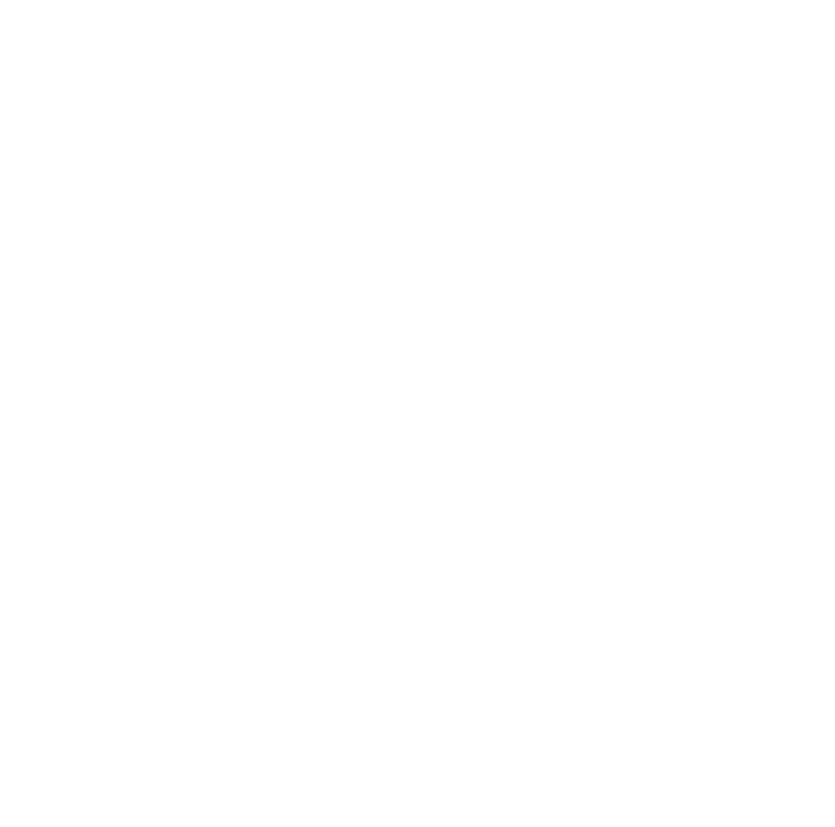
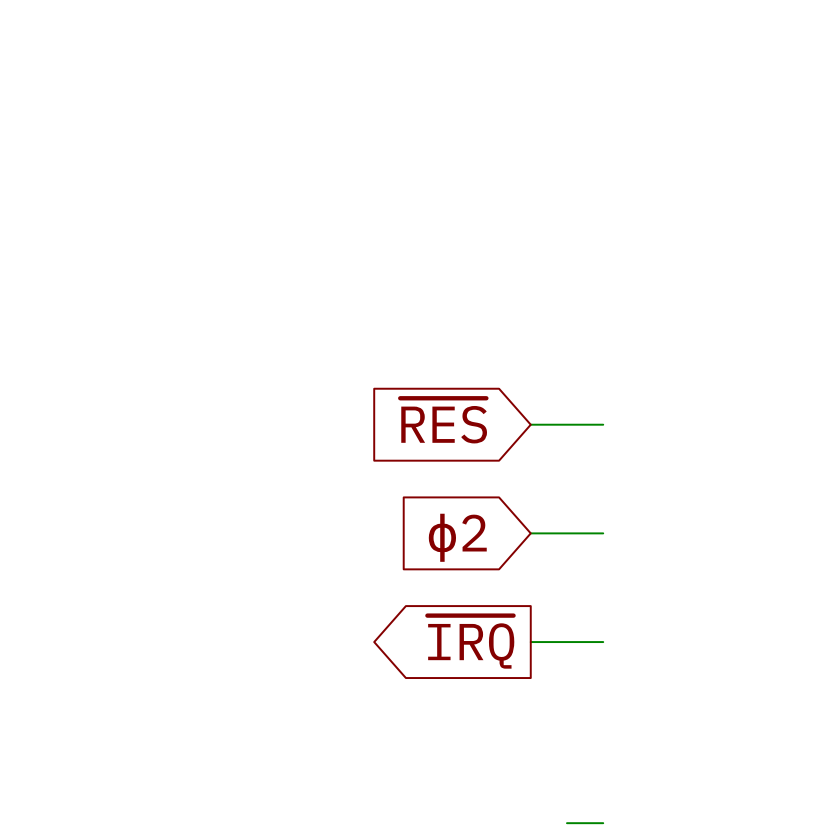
global label: none -> ~{RES} (443, 420)
wire: none -> (530, 424) (603, 424)
wire: none -> (530, 533) (603, 533)
global label: none -> ϕ2 (457, 537)
global label: none -> ~{IRQ} (470, 642)
wire: none -> (530, 642) (603, 642)
wire: none -> (566, 823) (603, 823)

